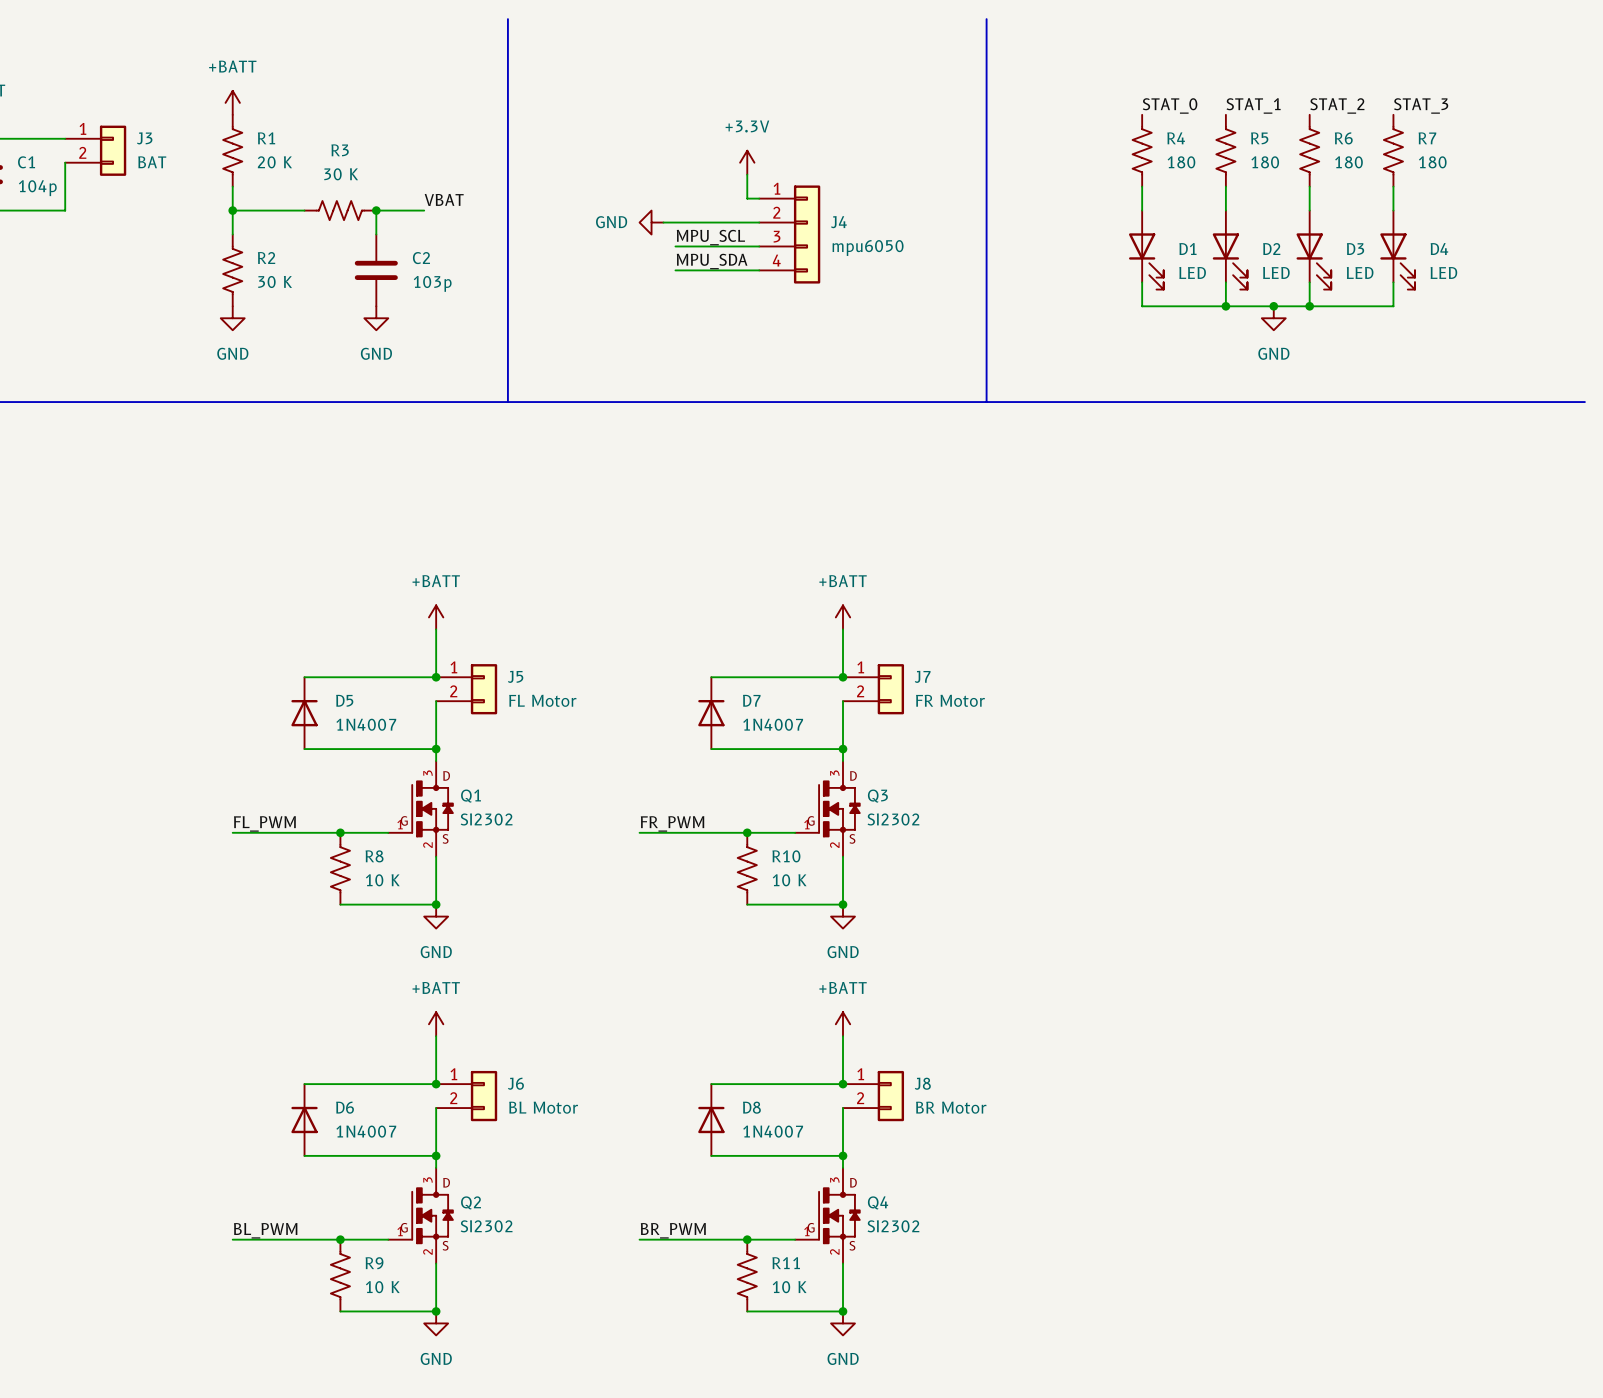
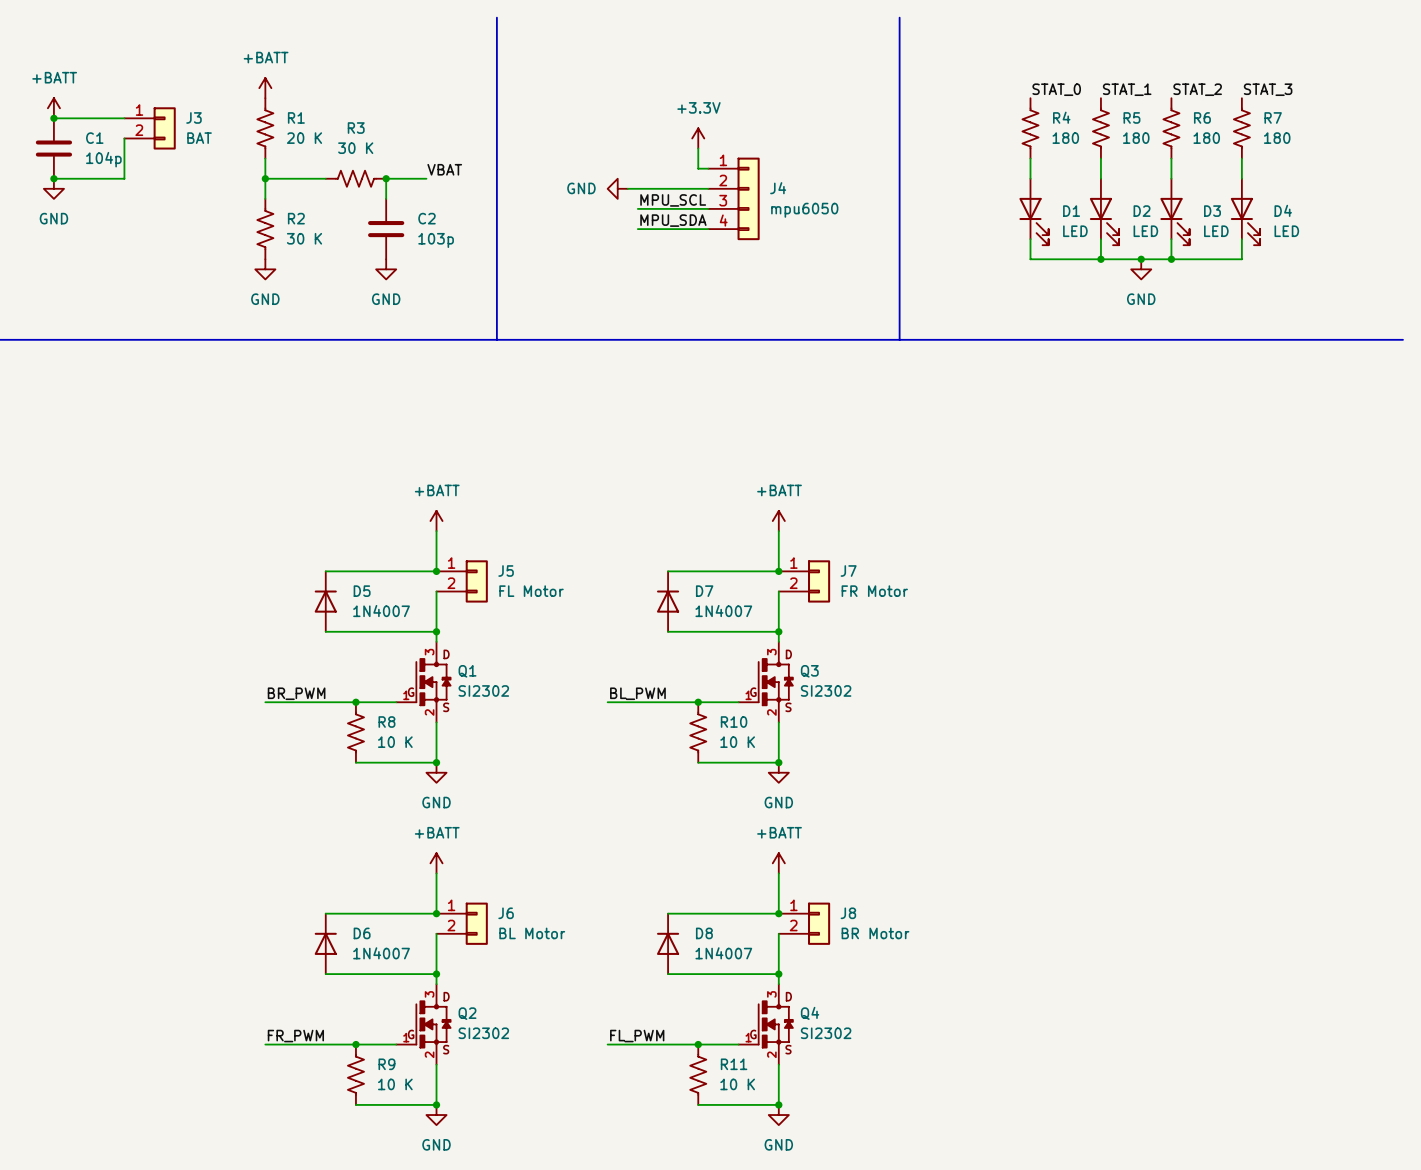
label: FL_PWM (264, 823) -> BR_PWM (296, 693)
label: FR_PWM (672, 823) -> BL_PWM (637, 693)
label: BL_PWM (265, 1230) -> FR_PWM (295, 1036)
label: BR_PWM (673, 1230) -> FL_PWM (637, 1036)

